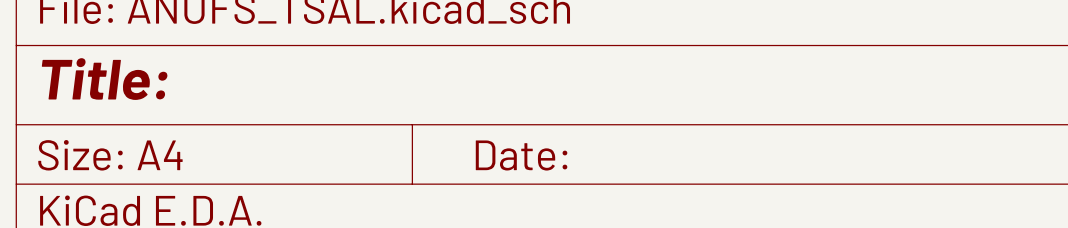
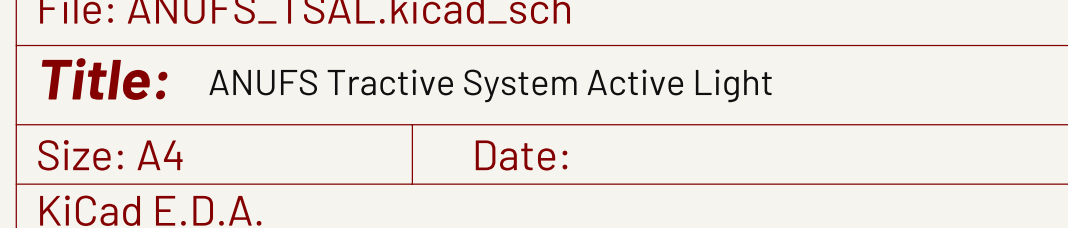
label: none -> ANUFS Tractive System Active Light (490, 85)

